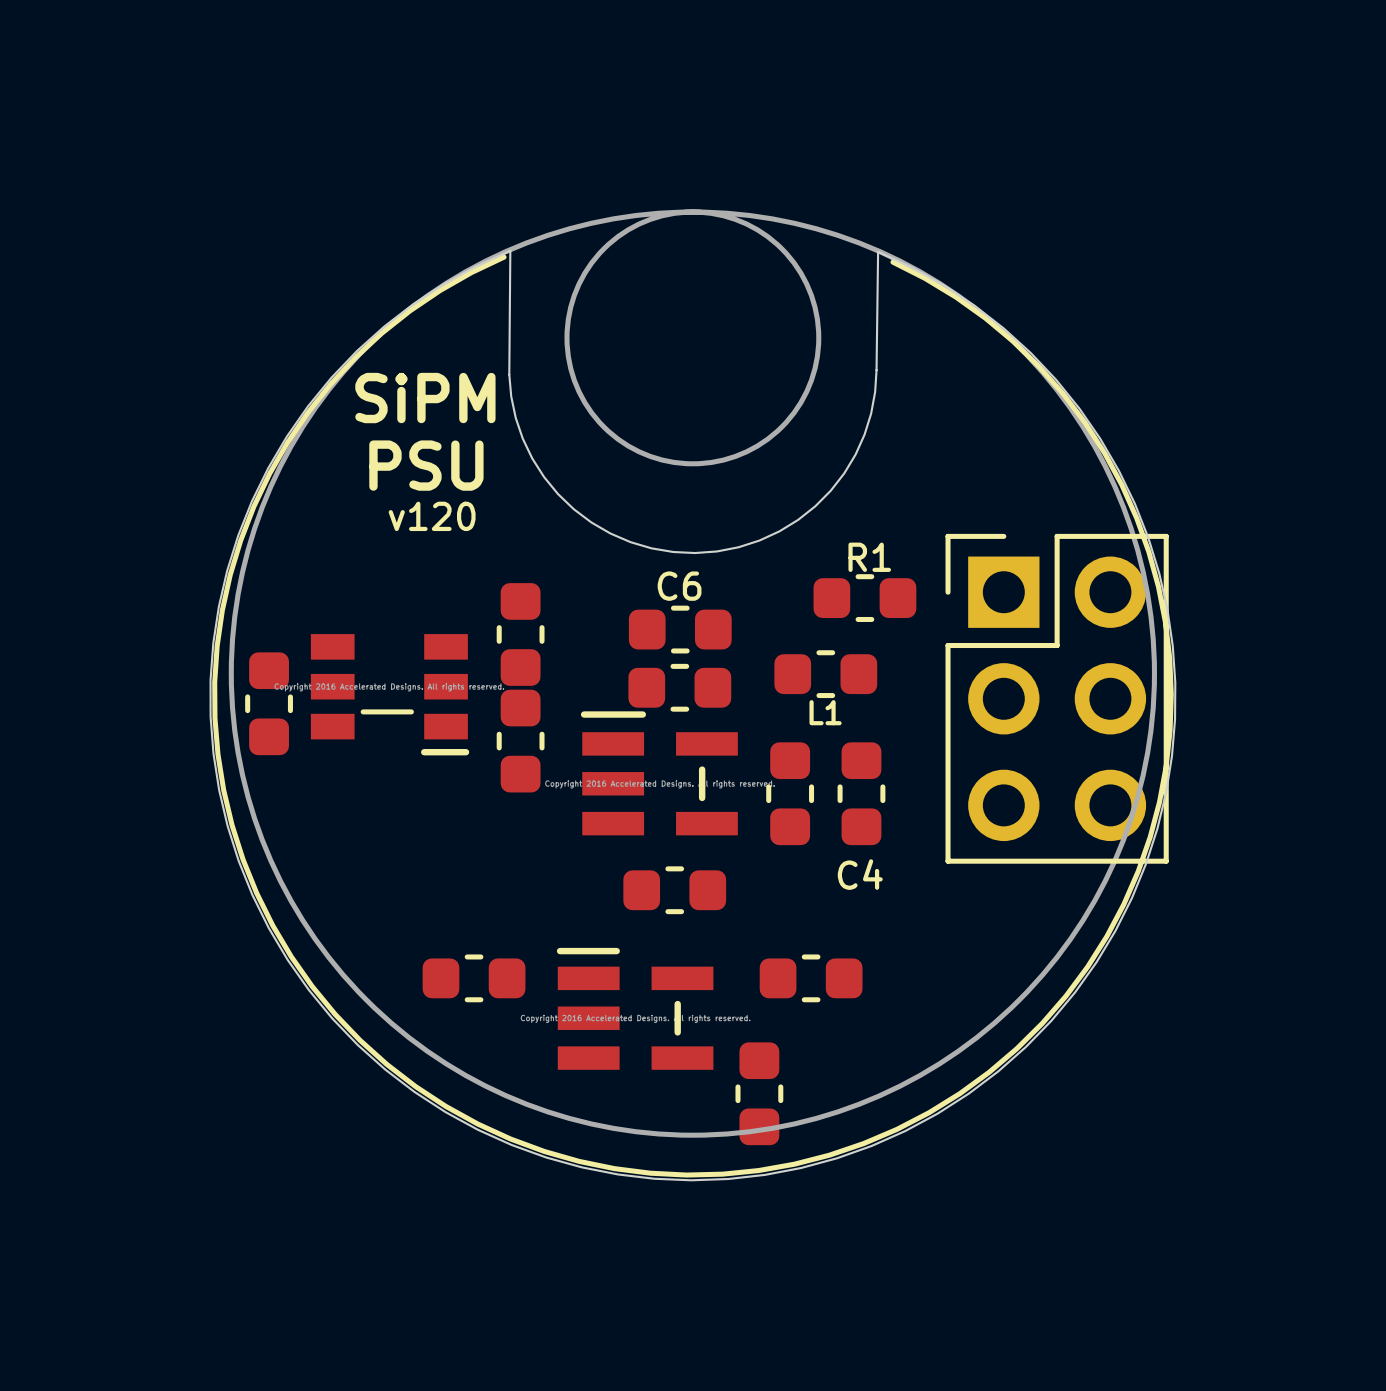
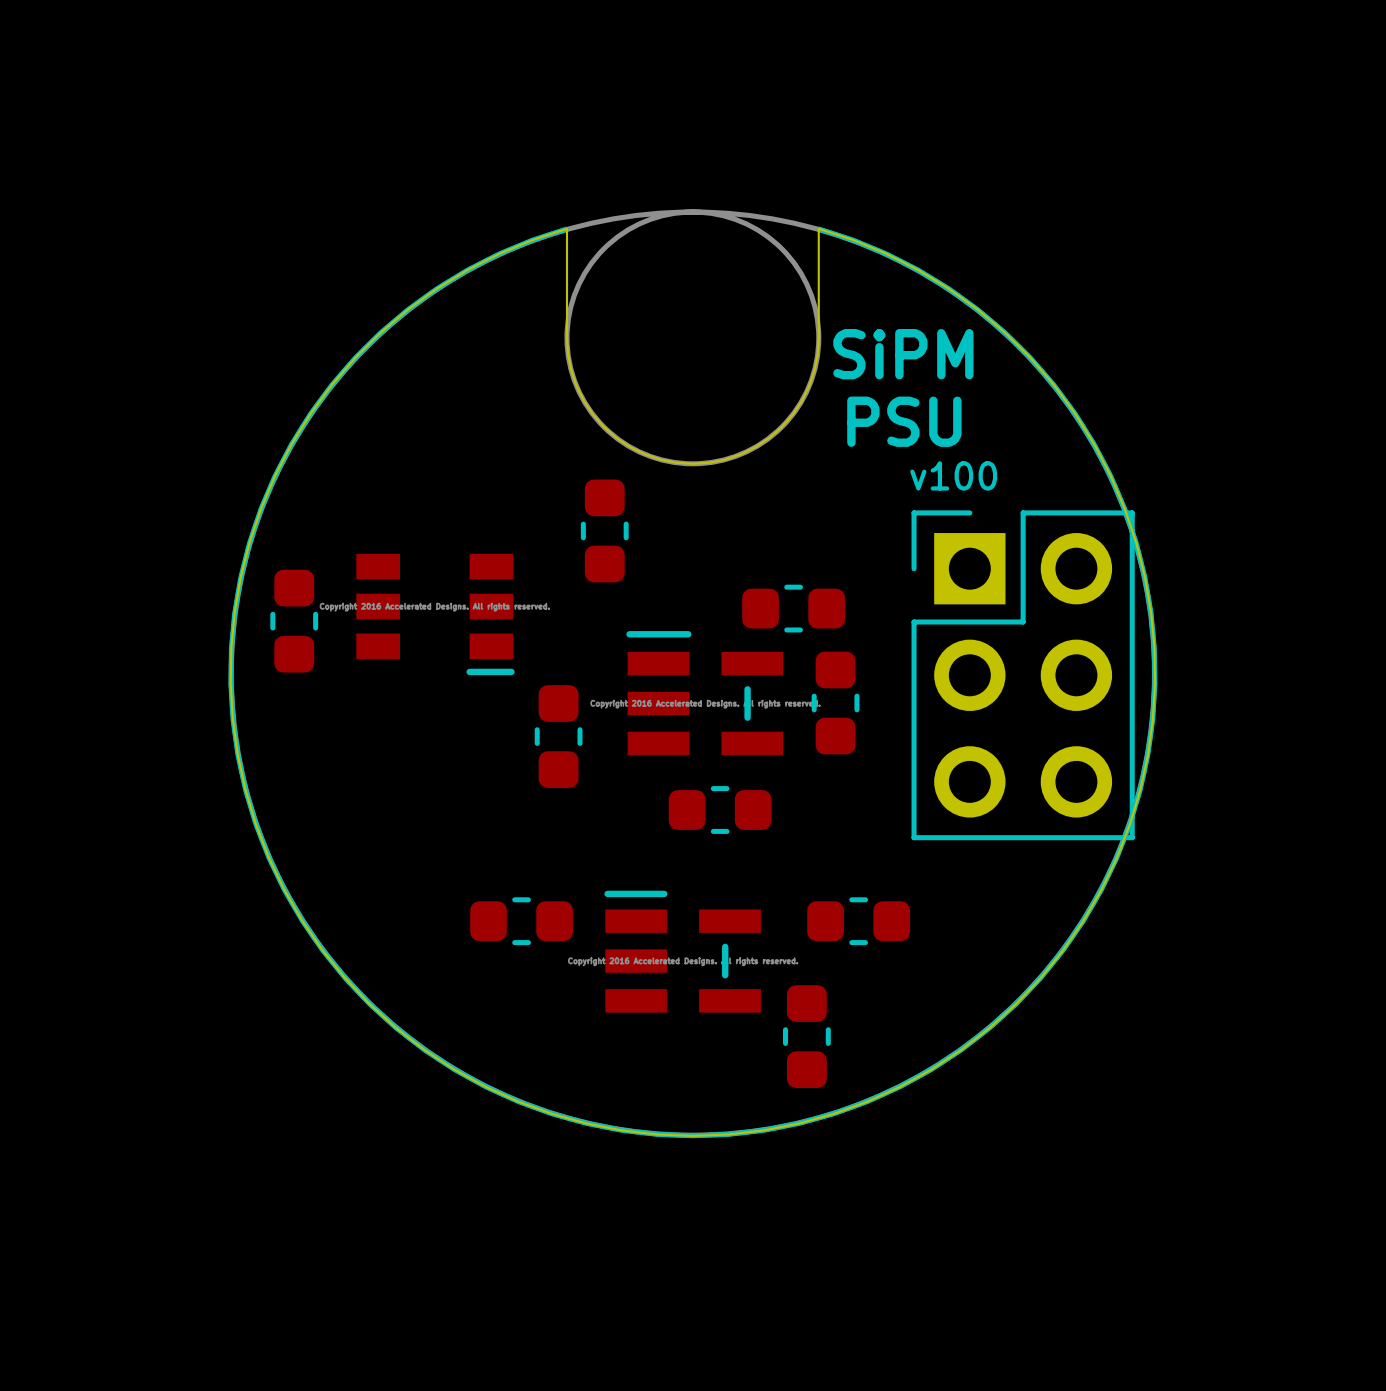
line: none -> (566, 229) (532, 240) (467, 270) (407, 309) (380, 333) (331, 385) (291, 444) (261, 509) (240, 577) (234, 612) (230, 684) (238, 755) (256, 824) (269, 857) (302, 920) (345, 978) (396, 1028) (454, 1069) (486, 1086) (552, 1113) (621, 1130) (693, 1135) (764, 1130) (833, 1113) (900, 1086) (961, 1049) (989, 1027) (1040, 977) (1083, 920) (1116, 857) (1129, 824) (1147, 754) (1154, 683) (1154, 648) (1144, 577) (1124, 508) (1093, 444) (1053, 385) (1030, 357) (977, 309) (948, 288) (886, 253) (819, 229)
board edge: (510, 250) (509, 374) (515, 417) (522, 438) (532, 458) (558, 494) (591, 522) (630, 542) (651, 548) (695, 553) (738, 547) (759, 540) (798, 519) (830, 490) (855, 454) (871, 413) (876, 370) (878, 251) (943, 285) (974, 305) (1030, 353) (1079, 408) (1118, 470) (1134, 504) (1148, 538) (1167, 609) (1175, 682) (1171, 756) (1166, 792) (1157, 828) (1132, 897) (1115, 930) (1075, 992) (1025, 1047) (968, 1093) (937, 1113) (871, 1146) (801, 1168) (764, 1174) (728, 1178) (654, 1178) (581, 1167) (546, 1157) (477, 1129) (445, 1112) (385, 1069) (332, 1018) (308, 990) (268, 928) (238, 860) (219, 789) (210, 716) (210, 679) (218, 606) (238, 535) (251, 501) (286, 436) (308, 406) (356, 351) (413, 304) (476, 266) (510, 250) -> (566, 228) (532, 239) (467, 269) (408, 309) (355, 357) (332, 384) (291, 443) (275, 475) (249, 542) (234, 612) (231, 647) (232, 719) (245, 789) (255, 824) (284, 889) (322, 950) (369, 1004) (396, 1028) (424, 1049) (485, 1086) (551, 1113) (586, 1123) (657, 1134) (728, 1134) (764, 1130) (833, 1113) (867, 1101) (931, 1069) (989, 1028) (1016, 1004) (1063, 950) (1101, 889) (1129, 824) (1147, 754) (1152, 719) (1155, 683) (1151, 612) (1136, 542) (1124, 508) (1093, 443) (1074, 413) (1030, 357) (977, 309) (948, 288) (885, 253) (818, 228) (817, 354) (809, 386) (792, 414) (769, 437) (755, 446) (741, 454) (709, 462) (676, 462) (644, 454) (629, 446) (616, 437) (593, 414) (576, 386) (571, 370) (566, 337) (566, 228)
line: (504, 257) (439, 290) (410, 310) (355, 357) (307, 412) (269, 473) (240, 540) (222, 610) (214, 682) (217, 754) (223, 790) (243, 859) (272, 925) (291, 956) (335, 1014) (387, 1064) (445, 1106) (477, 1123) (544, 1151) (614, 1168) (686, 1175) (758, 1170) (829, 1155) (897, 1129) (929, 1112) (989, 1072) (1042, 1023) (1066, 996) (1106, 936) (1138, 871) (1159, 802) (1170, 730) (1169, 658) (1158, 586) (1148, 551) (1121, 484) (1104, 453) (1063, 393) (1013, 341) (956, 297) (892, 262) -> none
text position: SiPM (425, 398) -> SiPM (903, 354)
text position: PSU (426, 465) -> PSU (904, 421)
text: none -> v100 (953, 475)
text: v120 (432, 516) -> none
part: none -> (604, 530)
R1: (864, 598) -> none
part: none -> (793, 608)
C6: (680, 629) -> none
part: (520, 634) -> none
part footprint: [628, 663, 732, 712] -> [626, 631, 784, 756]
L1: (825, 674) -> none
part position: (390, 694) -> (435, 614)
part position: (1057, 698) -> (1023, 675)
part: none -> (835, 702)
part position: (269, 703) -> (294, 621)
line: (363, 711) (411, 711) -> none
part position: (520, 741) -> (558, 736)
part: (659, 773) -> none
part: (790, 793) -> none
C4: (861, 793) -> none
part: none -> (720, 809)
part: (674, 890) -> none
part: none -> (858, 921)
part position: (474, 978) -> (521, 921)
part: (811, 978) -> none
part position: (635, 1008) -> (682, 951)
part: none -> (806, 1036)
part: (759, 1093) -> none

